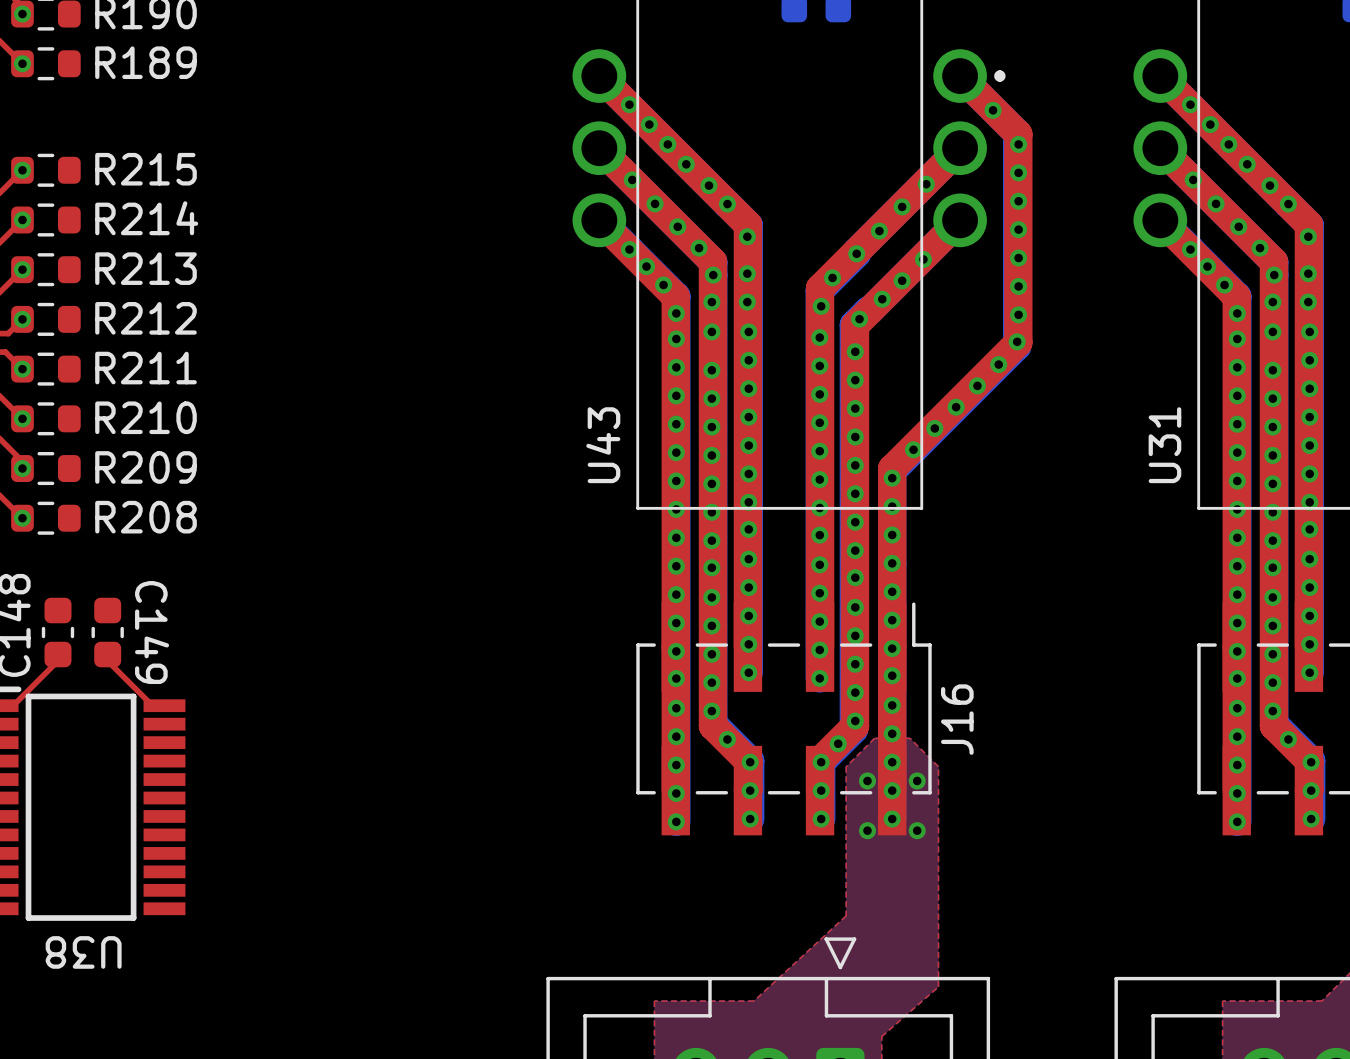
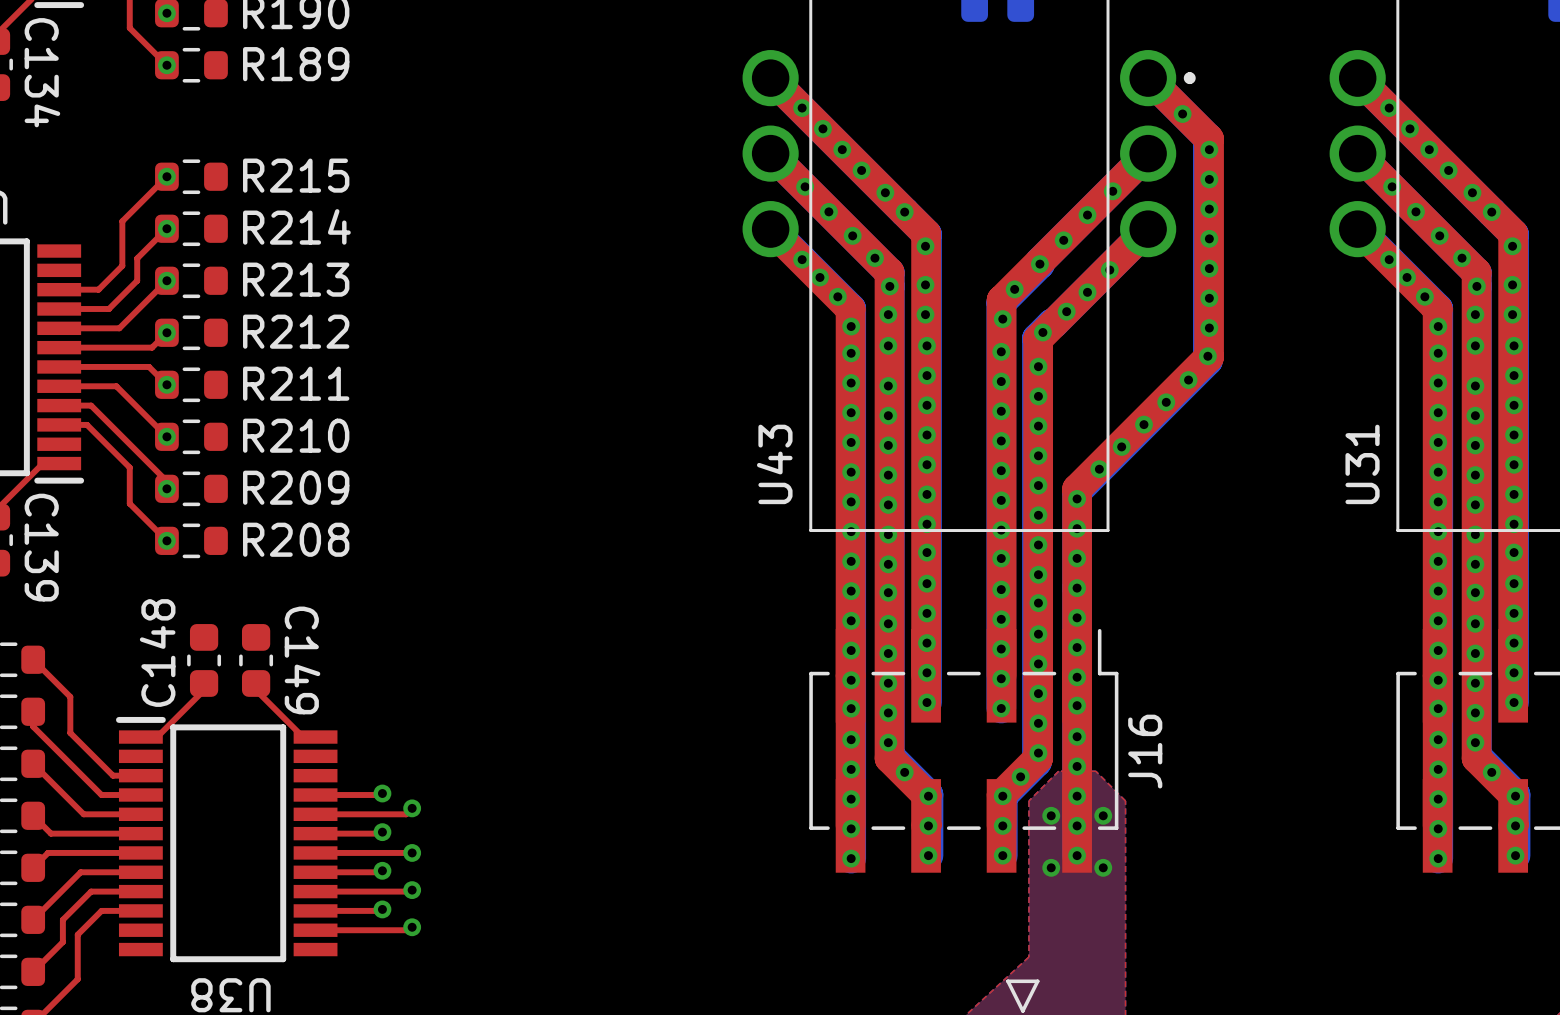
top track: none -> (382, 793) (315, 794)
via: none -> (382, 793)
top track: none -> (412, 808) (406, 814) (315, 814)
via: none -> (412, 808)
top track: none -> (382, 832) (315, 833)
via: none -> (382, 832)
top track: none -> (315, 852) (412, 852)
via: none -> (412, 852)
top track: none -> (382, 870) (315, 872)
via: none -> (382, 870)
top track: none -> (412, 890) (315, 891)
via: none -> (412, 890)
top track: none -> (382, 909) (315, 910)
via: none -> (382, 909)
top track: none -> (412, 927) (409, 930) (315, 930)
via: none -> (412, 927)

